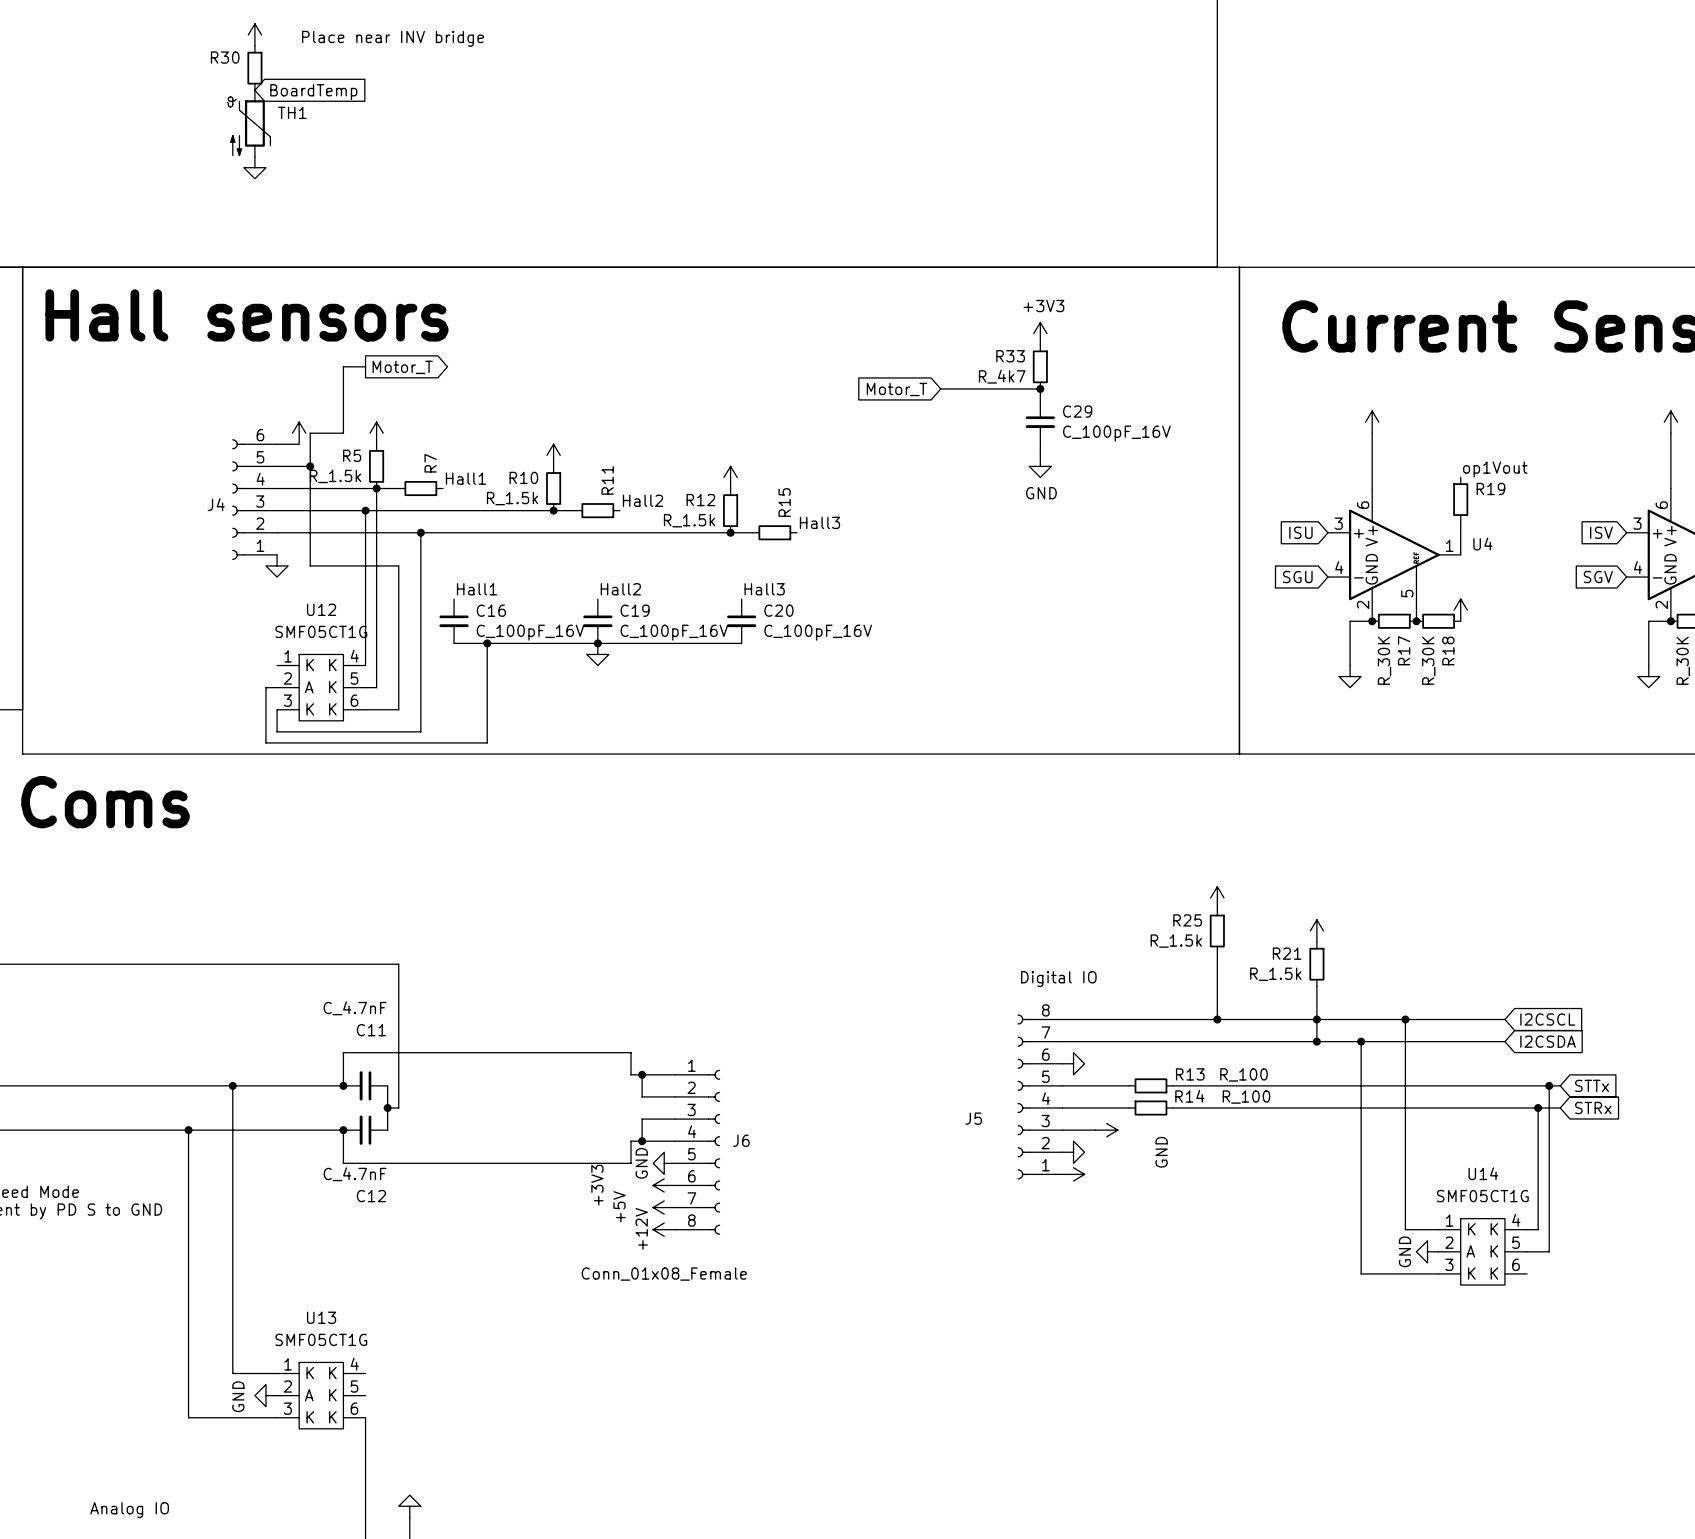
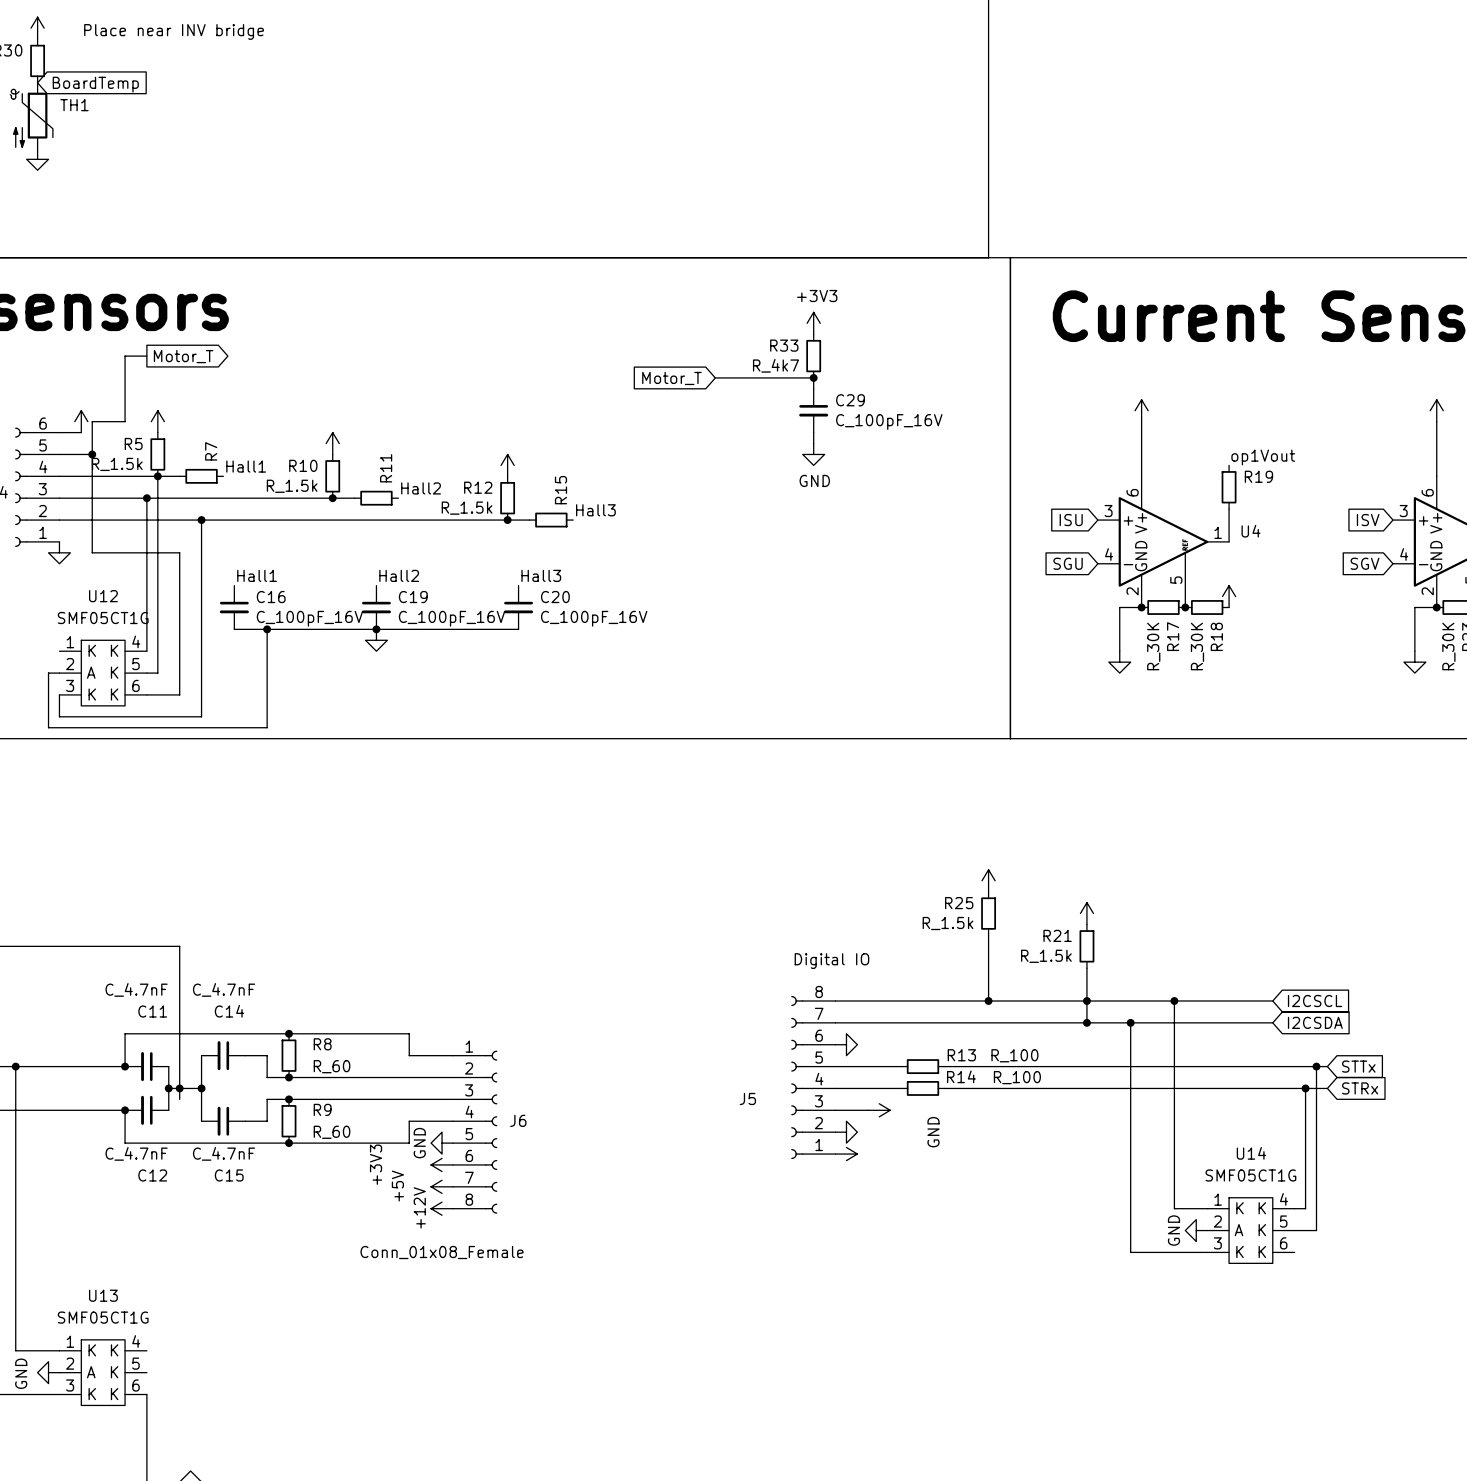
junction: none -> (289, 1033)
wire: none -> (201, 1055) (201, 1121)
C14: none -> C_4.7nF (223, 1055)
R8: none -> R_60 (289, 1055)
wire: (642, 1074) (642, 1096) -> (245, 1055) (267, 1055) (267, 1077) (420, 1077)
junction: (642, 1074) -> none
junction: none -> (289, 1077)
junction: none -> (179, 1088)
wire: none -> (201, 1088) (179, 1088) (179, 1099)
junction: none -> (201, 1088)
junction: none -> (289, 1099)
wire: (642, 1119) (642, 1141) -> (420, 1099) (267, 1099) (267, 1121) (245, 1121)
C15: none -> C_4.7nF (223, 1121)
R9: none -> R_60 (289, 1121)
junction: (642, 1141) -> none
junction: none -> (289, 1143)

